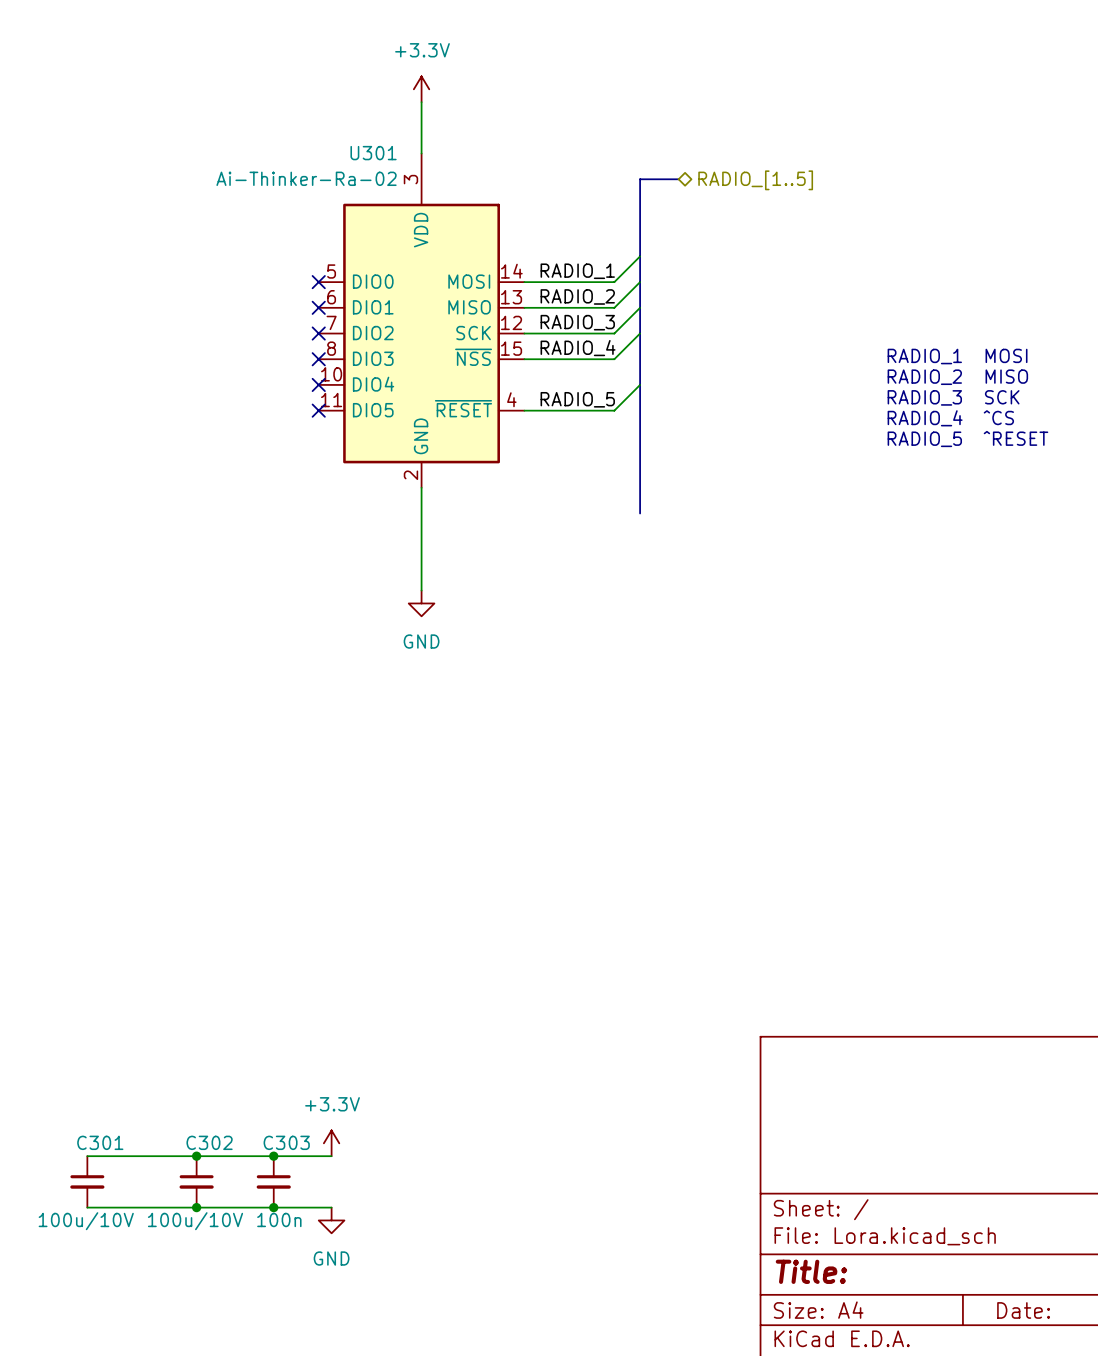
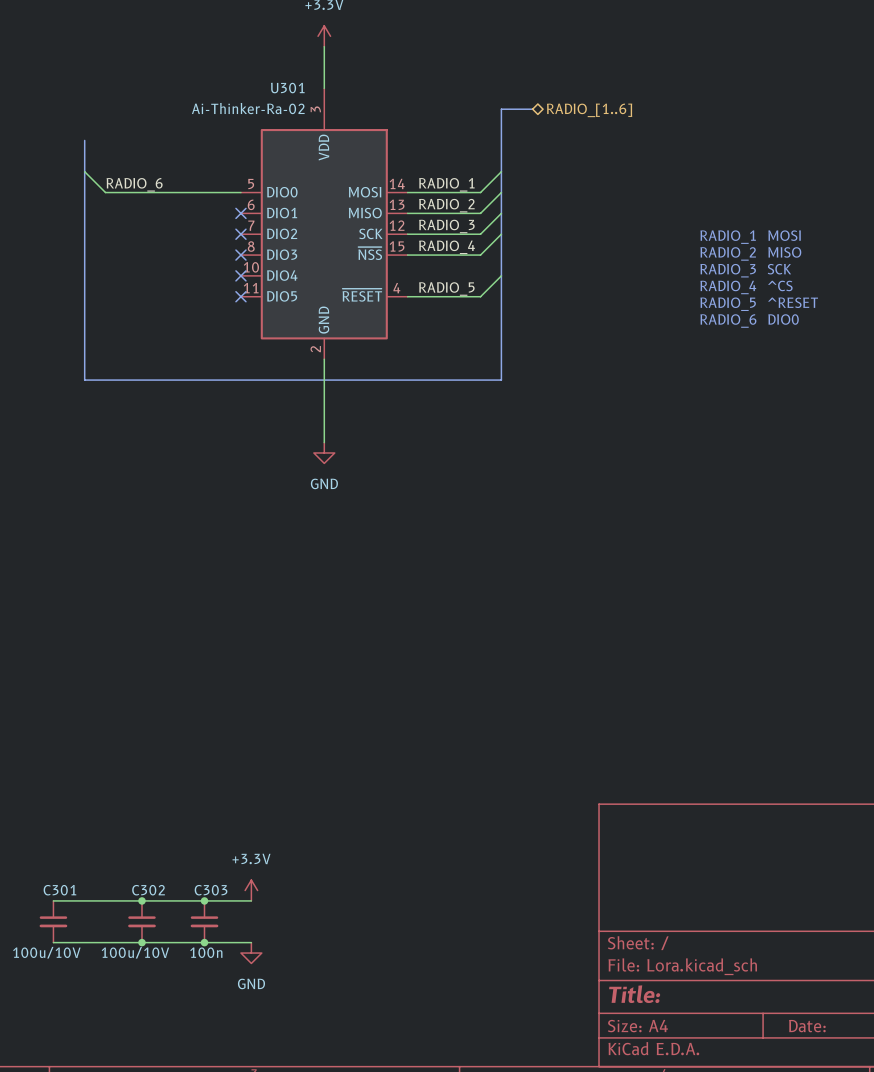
hierarchical label: RADIO_[1..5] (755, 180) -> RADIO_[1..6] (589, 110)
bus: none -> (84, 140) (84, 380) (501, 380)
wire: none -> (84, 171) (105, 192) (240, 192)
label: none -> RADIO_6 (134, 184)
no-connect mark: (318, 282) -> none
text: none -> RADIO_1 MOSI (750, 237)
text: RADIO_1 MOSI (957, 356) -> RADIO_2 MISO (750, 253)
text: RADIO_2 MISO (957, 377) -> RADIO_3 SCK (745, 270)
text: RADIO_3 SCK (953, 397) -> RADIO_4 ^CS (746, 287)
text: RADIO_4 ^CS (950, 418) -> RADIO_5 ^RESET (759, 304)
text: RADIO_5 ^RESET (967, 438) -> RADIO_6 DIO0 (749, 321)

